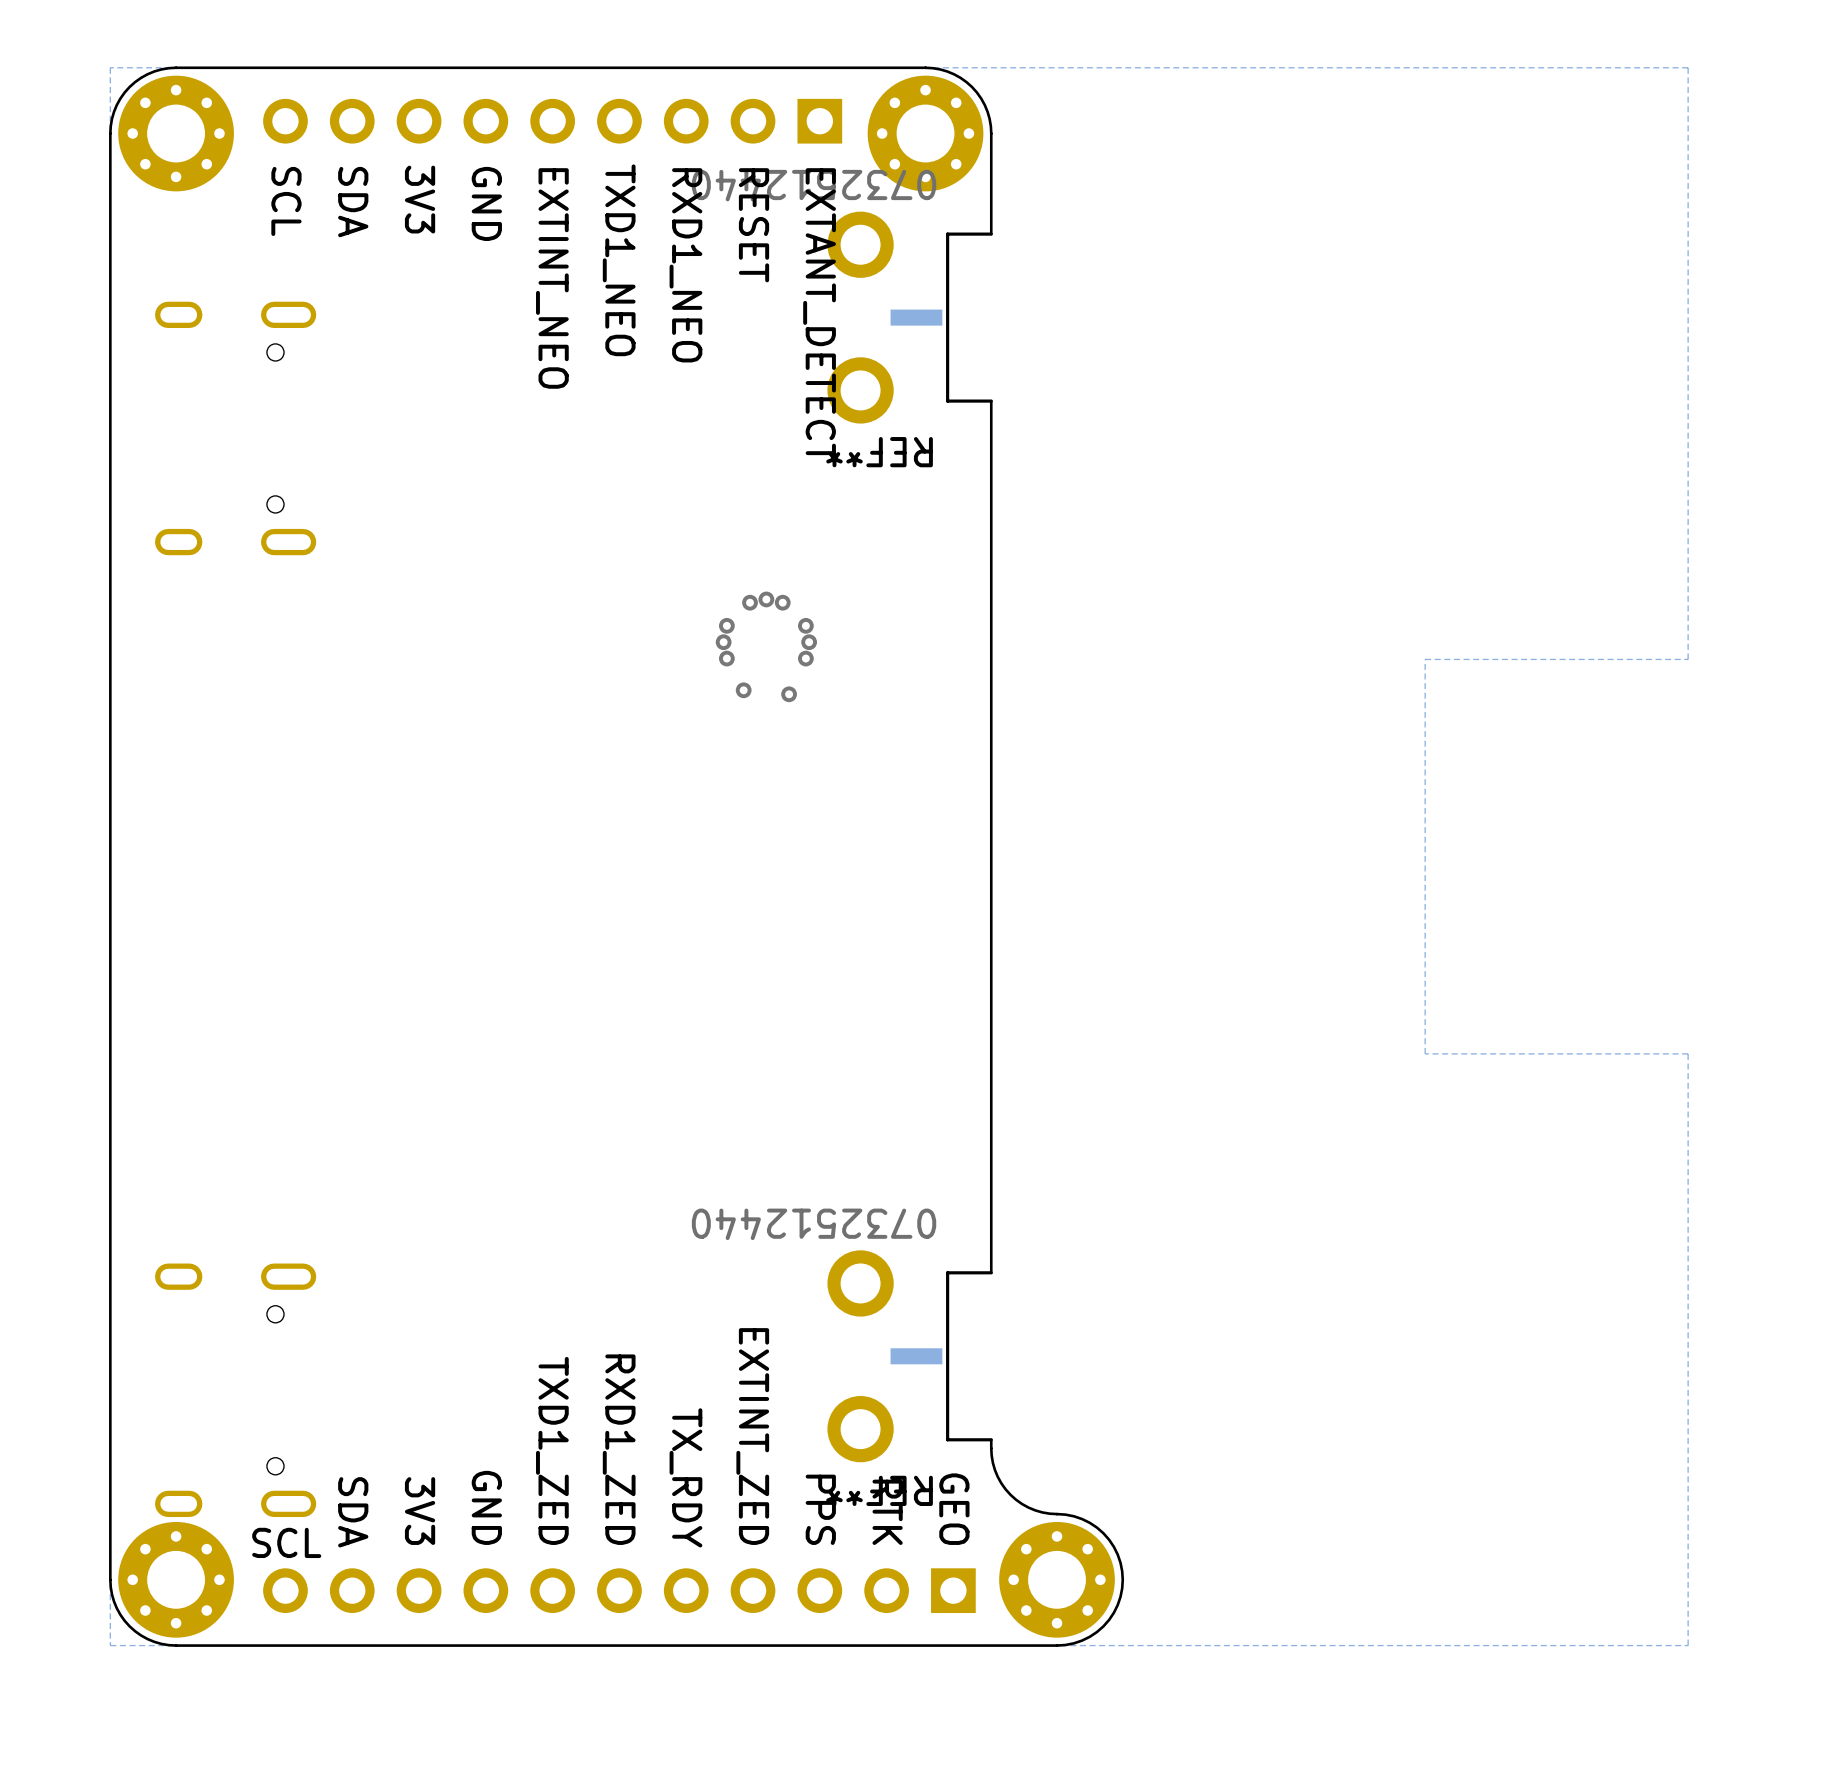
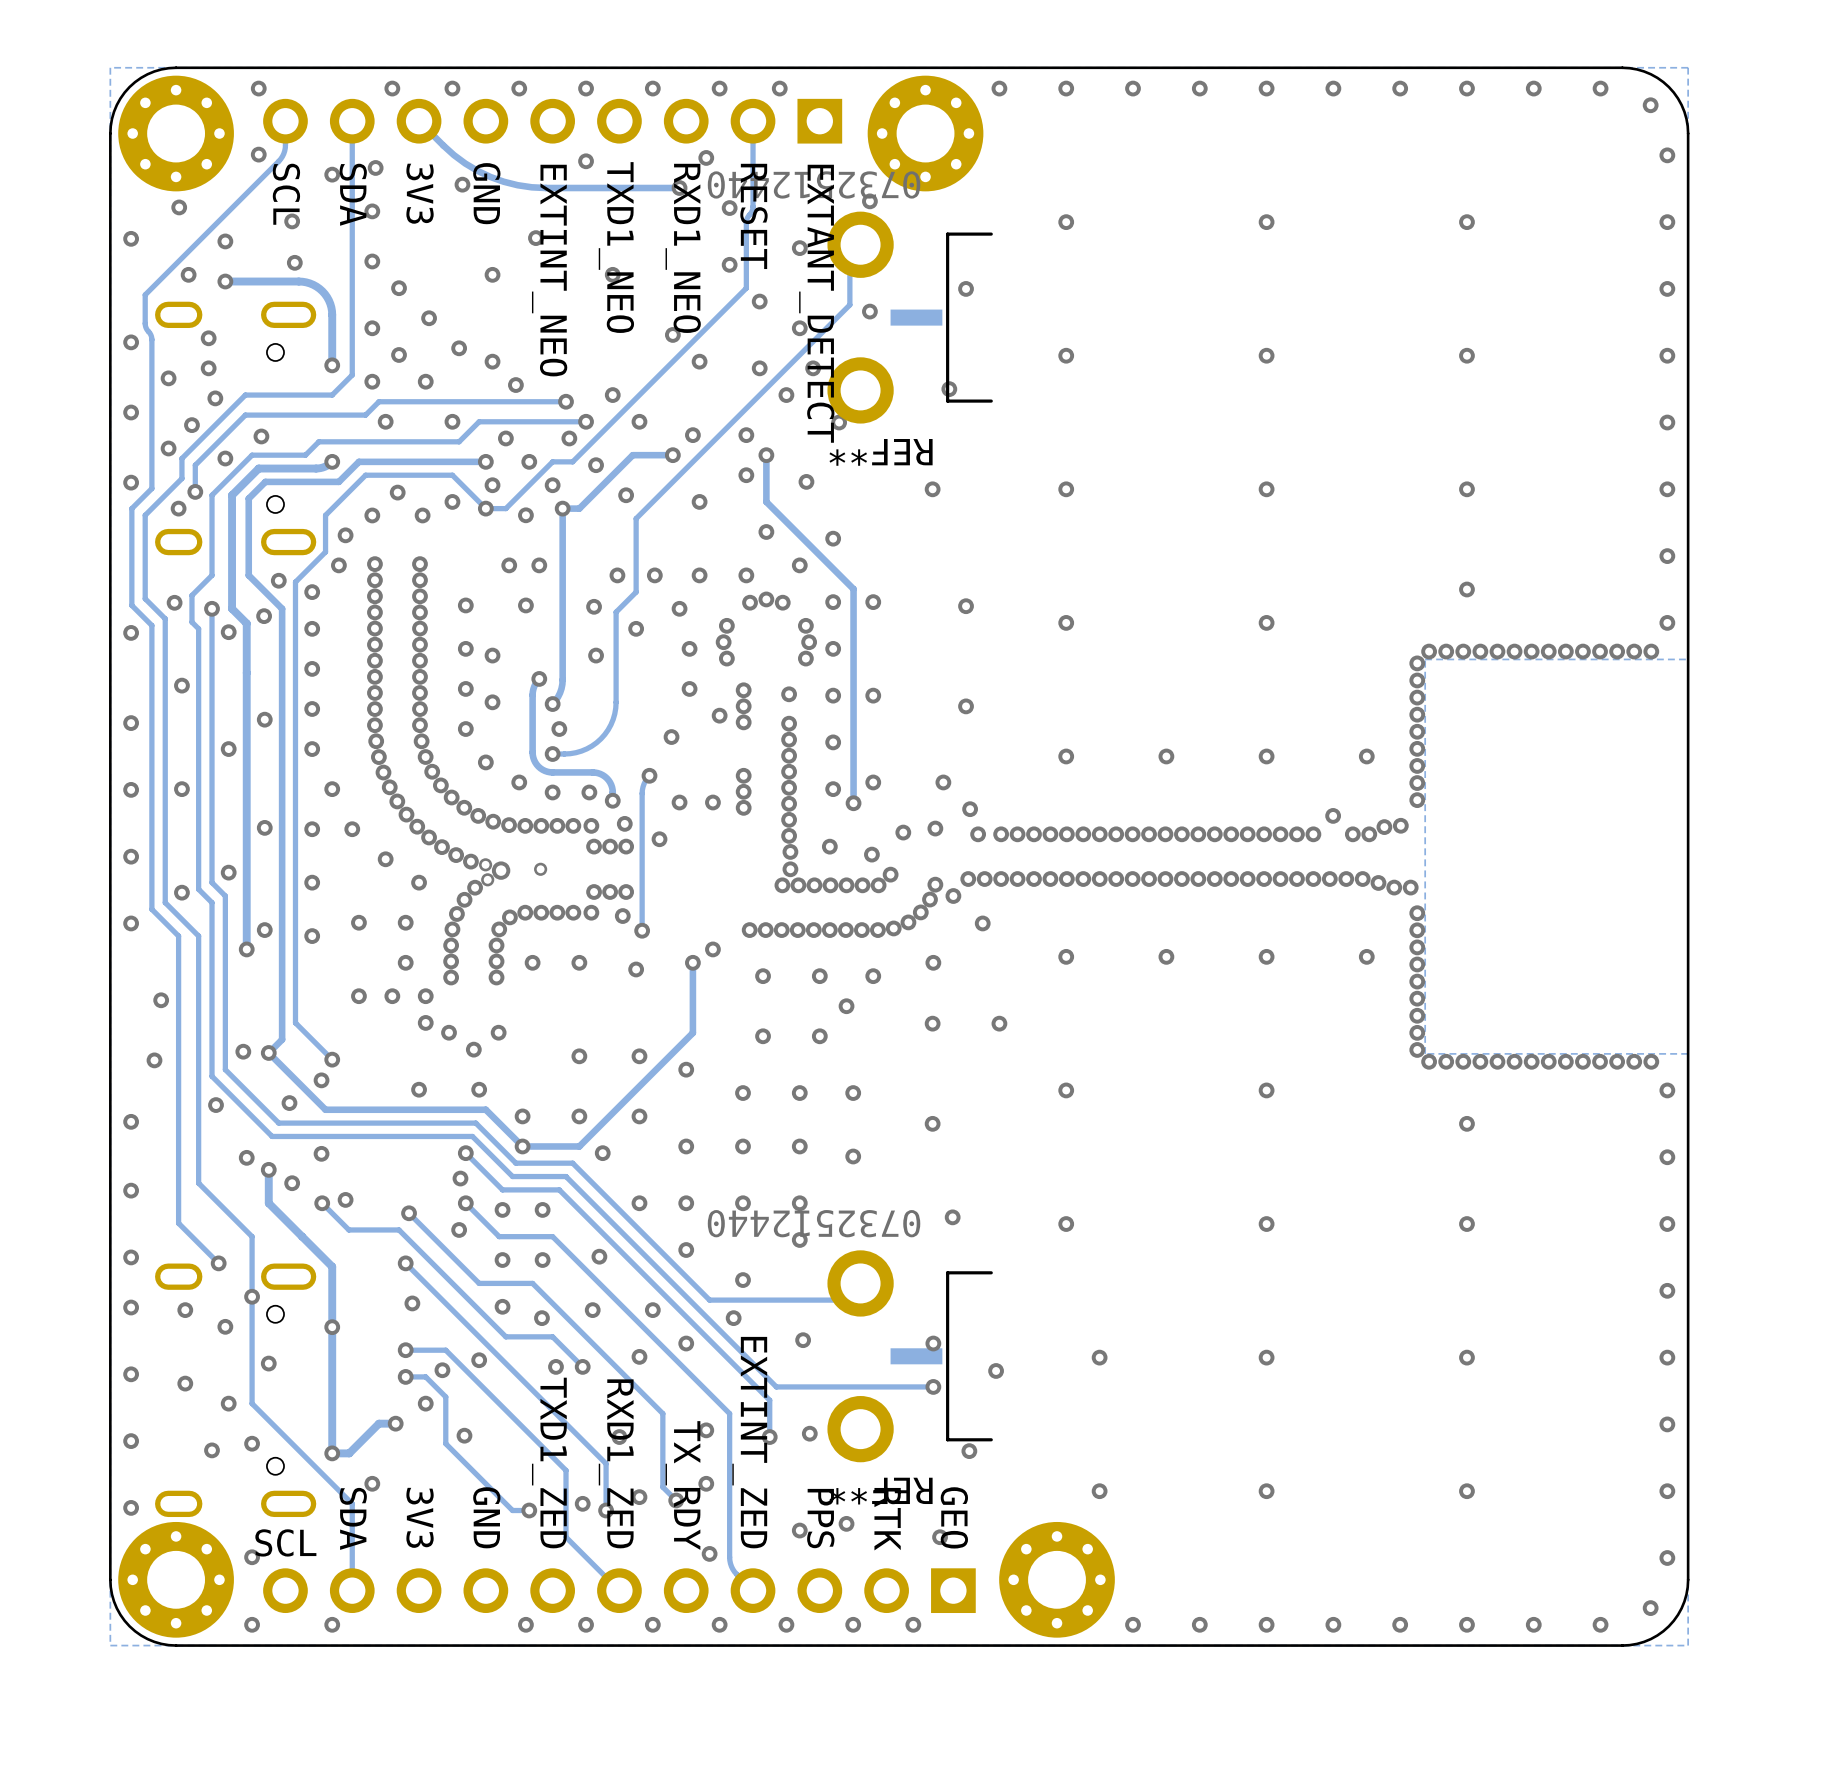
board edge: (925, 67) (940, 69) (960, 77) (976, 92) (987, 111) (991, 133) (991, 234) -> none
via: none -> (258, 88)
via: none -> (392, 88)
via: none -> (452, 88)
via: none -> (519, 88)
via: none -> (586, 88)
via: none -> (652, 88)
via: none -> (719, 88)
via: none -> (779, 88)
via: none -> (999, 88)
via: none -> (1066, 88)
via: none -> (1133, 88)
via: none -> (1199, 88)
via: none -> (1266, 88)
via: none -> (1333, 88)
via: none -> (1400, 88)
via: none -> (1466, 88)
via: none -> (1533, 88)
via: none -> (1600, 88)
via: none -> (1650, 105)
track: none -> (285, 121) (285, 148) (280, 159) (145, 294) (145, 325) (151, 339) (151, 488) (131, 508) (131, 605) (151, 625) (151, 909) (178, 936) (178, 1223) (218, 1263)
track: none -> (352, 121) (352, 375) (332, 395) (245, 395) (181, 458) (181, 478) (145, 515) (145, 598) (165, 618) (165, 902) (198, 936) (198, 1183) (252, 1236) (252, 1403) (352, 1503) (352, 1590)
track: none -> (419, 121) (443, 145) (465, 163) (503, 181) (545, 188) (679, 188)
track: none -> (753, 121) (753, 206) (746, 221) (746, 288) (572, 461) (552, 461) (505, 508) (485, 508) (452, 475) (365, 475) (325, 515) (325, 552) (295, 582) (295, 1022) (332, 1059)
via: none -> (258, 154)
via: none -> (1667, 155)
via: none -> (706, 157)
via: none -> (586, 161)
via: none -> (375, 167)
via: none -> (332, 174)
via: none -> (462, 184)
via: none -> (679, 188)
via: none -> (869, 201)
via: none -> (179, 207)
via: none -> (729, 208)
via: none -> (372, 211)
via: none -> (292, 221)
via: none -> (1066, 222)
via: none -> (1266, 222)
via: none -> (1466, 222)
via: none -> (1667, 222)
track: none -> (849, 226) (849, 304) (636, 518) (636, 592) (616, 612) (616, 702) (613, 719) (604, 734) (591, 746) (575, 752) (552, 754)
via: none -> (131, 238)
via: none -> (535, 238)
via: none -> (225, 241)
via: none -> (799, 248)
via: none -> (372, 261)
via: none -> (294, 262)
via: none -> (729, 264)
via: none -> (188, 274)
via: none -> (492, 274)
via: none -> (612, 274)
track: none -> (225, 281) (302, 281) (319, 288) (328, 300) (332, 311) (332, 365)
via: none -> (225, 281)
via: none -> (399, 288)
via: none -> (966, 288)
via: none -> (1667, 288)
via: none -> (759, 301)
via: none -> (869, 311)
via: none -> (429, 318)
via: none -> (372, 328)
via: none -> (799, 328)
via: none -> (672, 334)
via: none -> (208, 338)
via: none -> (131, 342)
via: none -> (459, 348)
via: none -> (399, 354)
via: none -> (1066, 355)
via: none -> (1266, 355)
via: none -> (1466, 355)
via: none -> (1667, 355)
via: none -> (492, 361)
via: none -> (699, 361)
via: none -> (332, 365)
via: none -> (208, 368)
via: none -> (759, 368)
via: none -> (813, 368)
via: none -> (168, 378)
via: none -> (372, 381)
via: none -> (425, 381)
via: none -> (515, 385)
via: none -> (949, 389)
via: none -> (612, 395)
via: none -> (786, 395)
via: none -> (215, 398)
track: none -> (566, 401) (378, 401) (365, 415) (245, 415) (195, 465) (195, 491)
via: none -> (566, 401)
board edge: (991, 401) (991, 1272) -> none
via: none -> (131, 412)
via: none -> (385, 421)
via: none -> (452, 421)
track: none -> (586, 421) (479, 421) (459, 441) (318, 441) (305, 455) (252, 455) (212, 495) (212, 575) (191, 595) (191, 622) (198, 628) (198, 889) (212, 902) (212, 1076) (272, 1136) (472, 1136) (512, 1176) (566, 1176) (776, 1386) (933, 1386)
via: none -> (586, 421)
via: none -> (639, 421)
via: none -> (839, 422)
via: none -> (1667, 422)
via: none -> (191, 425)
via: none -> (692, 435)
via: none -> (746, 435)
via: none -> (261, 436)
via: none -> (505, 438)
via: none -> (569, 438)
via: none -> (168, 448)
track: none -> (672, 455) (632, 455) (579, 508) (562, 508) (562, 679) (560, 692) (552, 704)
via: none -> (672, 455)
track: none -> (766, 455) (766, 501) (853, 589) (853, 803)
via: none -> (766, 455)
via: none -> (225, 458)
track: none -> (332, 461) (318, 468) (258, 468) (232, 495) (232, 608) (246, 623) (246, 949)
via: none -> (332, 461)
track: none -> (485, 461) (358, 461) (338, 481) (265, 481) (248, 498) (248, 575) (282, 608) (282, 1039) (268, 1052) (325, 1109) (485, 1109) (522, 1146) (579, 1146) (692, 1032) (692, 962)
via: none -> (485, 461)
via: none -> (529, 461)
via: none -> (596, 465)
via: none -> (746, 475)
via: none -> (806, 481)
via: none -> (131, 482)
via: none -> (492, 485)
via: none -> (552, 485)
via: none -> (932, 489)
via: none -> (1066, 489)
via: none -> (1266, 489)
via: none -> (1466, 489)
via: none -> (1667, 489)
via: none -> (195, 491)
via: none -> (397, 492)
via: none -> (626, 495)
via: none -> (452, 501)
via: none -> (699, 501)
via: none -> (178, 508)
via: none -> (485, 508)
via: none -> (562, 508)
via: none -> (372, 515)
via: none -> (422, 515)
via: none -> (525, 515)
via: none -> (766, 531)
via: none -> (345, 535)
via: none -> (833, 538)
via: none -> (1667, 556)
via: none -> (374, 564)
via: none -> (419, 564)
via: none -> (338, 565)
via: none -> (509, 565)
via: none -> (539, 565)
via: none -> (799, 565)
via: none -> (617, 575)
via: none -> (654, 575)
via: none -> (699, 575)
via: none -> (746, 575)
via: none -> (278, 580)
via: none -> (374, 580)
via: none -> (419, 580)
via: none -> (1466, 589)
via: none -> (312, 592)
via: none -> (374, 596)
via: none -> (419, 596)
via: none -> (174, 602)
via: none -> (833, 602)
via: none -> (873, 602)
via: none -> (465, 605)
via: none -> (525, 605)
via: none -> (594, 606)
via: none -> (966, 606)
track: none -> (212, 608) (212, 882) (225, 896) (225, 1069) (278, 1123) (475, 1123) (515, 1163) (572, 1163) (709, 1300) (856, 1300)
via: none -> (212, 608)
via: none -> (679, 608)
via: none -> (374, 612)
via: none -> (419, 612)
via: none -> (264, 616)
via: none -> (1066, 622)
via: none -> (1266, 622)
via: none -> (1667, 622)
via: none -> (312, 628)
via: none -> (374, 628)
via: none -> (419, 628)
via: none -> (636, 628)
via: none -> (131, 632)
via: none -> (228, 632)
via: none -> (374, 644)
via: none -> (419, 644)
via: none -> (465, 648)
via: none -> (689, 648)
via: none -> (833, 648)
via: none -> (1429, 651)
via: none -> (1446, 651)
via: none -> (1463, 651)
via: none -> (1480, 651)
via: none -> (1497, 651)
via: none -> (1514, 651)
via: none -> (1531, 651)
via: none -> (1548, 651)
via: none -> (1565, 651)
via: none -> (1582, 651)
via: none -> (1600, 651)
via: none -> (1617, 651)
via: none -> (1634, 651)
via: none -> (1651, 651)
via: none -> (492, 655)
via: none -> (596, 655)
via: none -> (374, 660)
via: none -> (419, 660)
via: none -> (1417, 663)
via: none -> (312, 668)
via: none -> (374, 676)
via: none -> (419, 676)
track: none -> (539, 678) (534, 686) (532, 695) (532, 752) (535, 762) (542, 769) (550, 772) (592, 772) (602, 775) (611, 784) (612, 800)
via: none -> (539, 678)
via: none -> (1417, 680)
via: none -> (181, 685)
via: none -> (465, 688)
via: none -> (689, 688)
via: none -> (374, 692)
via: none -> (419, 692)
via: none -> (833, 695)
via: none -> (873, 695)
via: none -> (1417, 697)
via: none -> (492, 702)
via: none -> (552, 704)
via: none -> (743, 706)
via: none -> (966, 706)
via: none -> (312, 708)
via: none -> (374, 709)
via: none -> (419, 709)
via: none -> (1417, 714)
via: none -> (719, 715)
via: none -> (264, 719)
via: none -> (743, 722)
via: none -> (131, 723)
via: none -> (789, 723)
via: none -> (374, 725)
via: none -> (419, 725)
via: none -> (465, 729)
via: none -> (559, 729)
via: none -> (1417, 731)
via: none -> (671, 737)
via: none -> (789, 739)
via: none -> (376, 741)
via: none -> (421, 741)
via: none -> (833, 742)
via: none -> (1417, 748)
via: none -> (228, 749)
via: none -> (312, 749)
via: none -> (552, 754)
via: none -> (789, 755)
via: none -> (1066, 756)
via: none -> (1166, 756)
via: none -> (1266, 756)
via: none -> (1366, 756)
via: none -> (378, 757)
via: none -> (425, 757)
via: none -> (485, 762)
via: none -> (1417, 765)
via: none -> (432, 771)
via: none -> (789, 771)
via: none -> (383, 772)
track: none -> (649, 775) (644, 783) (642, 793) (642, 930)
via: none -> (649, 775)
via: none -> (743, 775)
via: none -> (519, 782)
via: none -> (873, 782)
via: none -> (943, 782)
via: none -> (1417, 783)
via: none -> (440, 785)
via: none -> (389, 787)
via: none -> (789, 787)
via: none -> (131, 789)
via: none -> (181, 789)
via: none -> (332, 789)
via: none -> (833, 789)
via: none -> (743, 791)
via: none -> (552, 792)
via: none -> (589, 792)
via: none -> (451, 797)
via: none -> (612, 800)
via: none -> (1417, 800)
via: none -> (397, 801)
via: none -> (679, 802)
via: none -> (712, 802)
via: none -> (789, 803)
via: none -> (853, 803)
via: none -> (464, 807)
via: none -> (743, 807)
via: none -> (970, 809)
via: none -> (406, 814)
via: none -> (478, 815)
via: none -> (1333, 815)
via: none -> (789, 819)
via: none -> (493, 821)
via: none -> (624, 823)
via: none -> (509, 825)
via: none -> (525, 825)
via: none -> (541, 825)
via: none -> (557, 825)
via: none -> (573, 825)
via: none -> (591, 825)
via: none -> (1400, 825)
via: none -> (417, 826)
via: none -> (264, 827)
via: none -> (1384, 827)
via: none -> (935, 828)
via: none -> (312, 829)
via: none -> (352, 829)
via: none -> (903, 832)
via: none -> (978, 834)
via: none -> (1001, 834)
via: none -> (1017, 834)
via: none -> (1034, 834)
via: none -> (1050, 834)
via: none -> (1066, 834)
via: none -> (1083, 834)
via: none -> (1099, 834)
via: none -> (1116, 834)
via: none -> (1132, 834)
via: none -> (1149, 834)
via: none -> (1165, 834)
via: none -> (1181, 834)
via: none -> (1198, 834)
via: none -> (1214, 834)
via: none -> (1231, 834)
via: none -> (1247, 834)
via: none -> (1264, 834)
via: none -> (1280, 834)
via: none -> (1296, 834)
via: none -> (1313, 834)
via: none -> (1352, 834)
via: none -> (1369, 834)
via: none -> (789, 835)
via: none -> (429, 837)
via: none -> (659, 839)
via: none -> (594, 846)
via: none -> (610, 846)
via: none -> (626, 846)
via: none -> (829, 846)
via: none -> (442, 847)
via: none -> (790, 851)
via: none -> (871, 854)
via: none -> (456, 855)
via: none -> (131, 856)
via: none -> (385, 859)
via: none -> (470, 861)
via: none -> (485, 864)
via: none -> (540, 869)
via: none -> (790, 869)
via: none -> (501, 870)
via: none -> (228, 872)
via: none -> (890, 874)
via: none -> (487, 879)
via: none -> (968, 879)
via: none -> (984, 879)
via: none -> (1001, 879)
via: none -> (1017, 879)
via: none -> (1034, 879)
via: none -> (1050, 879)
via: none -> (1066, 879)
via: none -> (1083, 879)
via: none -> (1099, 879)
via: none -> (1116, 879)
via: none -> (1132, 879)
via: none -> (1149, 879)
via: none -> (1165, 879)
via: none -> (1181, 879)
via: none -> (1198, 879)
via: none -> (1214, 879)
via: none -> (1231, 879)
via: none -> (1247, 879)
via: none -> (1264, 879)
via: none -> (1280, 879)
via: none -> (1296, 879)
via: none -> (1313, 879)
via: none -> (1329, 879)
via: none -> (1346, 879)
via: none -> (1362, 879)
via: none -> (312, 882)
via: none -> (419, 882)
via: none -> (1378, 882)
via: none -> (935, 884)
via: none -> (782, 885)
via: none -> (798, 885)
via: none -> (814, 885)
via: none -> (830, 885)
via: none -> (846, 885)
via: none -> (862, 885)
via: none -> (878, 885)
via: none -> (475, 887)
via: none -> (1394, 887)
via: none -> (1410, 887)
via: none -> (181, 892)
via: none -> (594, 892)
via: none -> (610, 892)
via: none -> (626, 892)
via: none -> (953, 896)
via: none -> (464, 899)
via: none -> (930, 899)
via: none -> (525, 912)
via: none -> (541, 912)
via: none -> (557, 912)
via: none -> (573, 912)
via: none -> (591, 912)
via: none -> (920, 912)
via: none -> (456, 913)
via: none -> (1417, 913)
via: none -> (622, 916)
via: none -> (509, 917)
via: none -> (358, 922)
via: none -> (405, 922)
via: none -> (908, 922)
via: none -> (131, 923)
via: none -> (982, 923)
via: none -> (893, 928)
via: none -> (452, 929)
via: none -> (499, 929)
via: none -> (264, 930)
via: none -> (642, 930)
via: none -> (749, 930)
via: none -> (765, 930)
via: none -> (781, 930)
via: none -> (797, 930)
via: none -> (813, 930)
via: none -> (829, 930)
via: none -> (845, 930)
via: none -> (861, 930)
via: none -> (877, 930)
via: none -> (1417, 930)
via: none -> (312, 936)
via: none -> (451, 945)
via: none -> (496, 945)
via: none -> (1417, 947)
via: none -> (246, 949)
via: none -> (712, 949)
via: none -> (1066, 956)
via: none -> (1166, 956)
via: none -> (1266, 956)
via: none -> (1366, 956)
via: none -> (451, 961)
via: none -> (496, 961)
via: none -> (405, 962)
via: none -> (532, 962)
via: none -> (579, 962)
via: none -> (692, 962)
via: none -> (933, 962)
via: none -> (1417, 964)
via: none -> (636, 969)
via: none -> (763, 976)
via: none -> (819, 976)
via: none -> (873, 976)
via: none -> (451, 977)
via: none -> (496, 977)
via: none -> (1417, 981)
via: none -> (358, 996)
via: none -> (392, 996)
via: none -> (425, 996)
via: none -> (1417, 998)
via: none -> (161, 1000)
via: none -> (846, 1006)
via: none -> (1417, 1015)
via: none -> (425, 1022)
via: none -> (932, 1023)
via: none -> (999, 1023)
via: none -> (449, 1032)
via: none -> (498, 1032)
via: none -> (1417, 1032)
via: none -> (763, 1036)
via: none -> (819, 1036)
via: none -> (473, 1049)
via: none -> (1417, 1049)
via: none -> (243, 1051)
via: none -> (268, 1052)
via: none -> (579, 1056)
via: none -> (639, 1056)
via: none -> (332, 1059)
via: none -> (154, 1060)
via: none -> (1429, 1061)
via: none -> (1446, 1061)
via: none -> (1463, 1061)
via: none -> (1480, 1061)
via: none -> (1497, 1061)
via: none -> (1514, 1061)
via: none -> (1531, 1061)
via: none -> (1548, 1061)
via: none -> (1565, 1061)
via: none -> (1582, 1061)
via: none -> (1600, 1061)
via: none -> (1617, 1061)
via: none -> (1634, 1061)
via: none -> (1651, 1061)
via: none -> (686, 1069)
via: none -> (321, 1080)
via: none -> (419, 1089)
via: none -> (479, 1089)
via: none -> (1066, 1090)
via: none -> (1266, 1090)
via: none -> (1667, 1090)
via: none -> (743, 1093)
via: none -> (799, 1093)
via: none -> (853, 1093)
via: none -> (289, 1103)
via: none -> (216, 1105)
via: none -> (522, 1116)
via: none -> (579, 1116)
via: none -> (639, 1116)
via: none -> (131, 1121)
via: none -> (932, 1123)
via: none -> (1466, 1123)
via: none -> (522, 1146)
via: none -> (686, 1146)
via: none -> (743, 1146)
via: none -> (799, 1146)
via: none -> (321, 1153)
track: none -> (465, 1153) (502, 1189) (559, 1189) (769, 1400) (769, 1437)
via: none -> (465, 1153)
via: none -> (602, 1153)
via: none -> (853, 1156)
via: none -> (246, 1157)
via: none -> (1667, 1157)
track: none -> (268, 1169) (268, 1203) (332, 1266) (332, 1453) (349, 1453) (378, 1423) (395, 1423)
via: none -> (268, 1169)
via: none -> (460, 1178)
via: none -> (292, 1183)
via: none -> (131, 1190)
via: none -> (345, 1199)
track: none -> (322, 1203) (348, 1229) (399, 1229) (505, 1336) (552, 1336) (582, 1366)
via: none -> (322, 1203)
track: none -> (465, 1203) (499, 1236) (552, 1236) (729, 1413) (729, 1560) (734, 1571) (753, 1590)
via: none -> (465, 1203)
via: none -> (639, 1203)
via: none -> (686, 1203)
via: none -> (743, 1203)
via: none -> (799, 1203)
via: none -> (502, 1209)
via: none -> (542, 1209)
track: none -> (409, 1213) (479, 1283) (532, 1283) (662, 1413) (662, 1487) (676, 1500)
via: none -> (409, 1213)
via: none -> (952, 1217)
via: none -> (1066, 1224)
via: none -> (1266, 1224)
via: none -> (1466, 1224)
via: none -> (1667, 1224)
via: none -> (459, 1229)
via: none -> (799, 1239)
via: none -> (686, 1250)
via: none -> (599, 1256)
via: none -> (131, 1257)
via: none -> (502, 1260)
via: none -> (542, 1260)
via: none -> (218, 1263)
track: none -> (405, 1263) (606, 1463) (606, 1510)
via: none -> (405, 1263)
via: none -> (743, 1280)
via: none -> (1667, 1290)
via: none -> (252, 1296)
via: none -> (412, 1303)
via: none -> (502, 1306)
via: none -> (131, 1307)
via: none -> (185, 1310)
via: none -> (592, 1310)
via: none -> (652, 1310)
via: none -> (541, 1318)
via: none -> (733, 1318)
via: none -> (225, 1326)
via: none -> (332, 1327)
via: none -> (803, 1340)
via: none -> (686, 1343)
via: none -> (933, 1343)
track: none -> (405, 1350) (445, 1350) (566, 1470) (566, 1537) (619, 1590)
via: none -> (405, 1350)
via: none -> (639, 1356)
via: none -> (1099, 1357)
via: none -> (1266, 1357)
via: none -> (1466, 1357)
via: none -> (1667, 1357)
via: none -> (479, 1360)
via: none -> (268, 1363)
via: none -> (555, 1366)
via: none -> (582, 1366)
via: none -> (442, 1370)
via: none -> (996, 1370)
via: none -> (131, 1374)
track: none -> (405, 1376) (425, 1376) (445, 1396) (445, 1443) (512, 1510) (529, 1510)
via: none -> (405, 1376)
via: none -> (185, 1383)
via: none -> (933, 1386)
via: none -> (228, 1403)
via: none -> (425, 1403)
via: none -> (395, 1423)
via: none -> (1667, 1424)
via: none -> (706, 1430)
via: none -> (809, 1433)
via: none -> (464, 1435)
via: none -> (619, 1437)
via: none -> (769, 1437)
board edge: (991, 1439) (991, 1455) (994, 1470) (1001, 1483) (1010, 1494) (1022, 1504) (1035, 1510) (1074, 1516) (1089, 1522) (1109, 1539) (1120, 1562) (1122, 1588) (1117, 1604) (1109, 1619) (1089, 1636) (1074, 1643) (1057, 1645) -> (925, 67) (1629, 68) (1650, 74) (1668, 87) (1681, 104) (1687, 126) (1688, 1579) (1686, 1594) (1681, 1608) (1673, 1620) (1663, 1631) (1644, 1641) (1629, 1645) (1057, 1645)
via: none -> (131, 1441)
via: none -> (252, 1443)
via: none -> (212, 1450)
via: none -> (969, 1451)
via: none -> (332, 1453)
via: none -> (372, 1483)
via: none -> (706, 1483)
via: none -> (1099, 1491)
via: none -> (1266, 1491)
via: none -> (1466, 1491)
via: none -> (1667, 1491)
via: none -> (639, 1497)
via: none -> (676, 1500)
via: none -> (582, 1503)
via: none -> (131, 1507)
via: none -> (529, 1510)
via: none -> (606, 1510)
via: none -> (846, 1523)
via: none -> (799, 1530)
via: none -> (940, 1537)
via: none -> (709, 1553)
via: none -> (252, 1557)
via: none -> (1667, 1557)
via: none -> (1650, 1608)
via: none -> (252, 1624)
via: none -> (332, 1624)
via: none -> (525, 1624)
via: none -> (586, 1624)
via: none -> (652, 1624)
via: none -> (719, 1624)
via: none -> (786, 1624)
via: none -> (853, 1624)
via: none -> (913, 1624)
via: none -> (1133, 1624)
via: none -> (1199, 1624)
via: none -> (1266, 1624)
via: none -> (1333, 1624)
via: none -> (1400, 1624)
via: none -> (1466, 1624)
via: none -> (1533, 1624)
via: none -> (1600, 1624)

